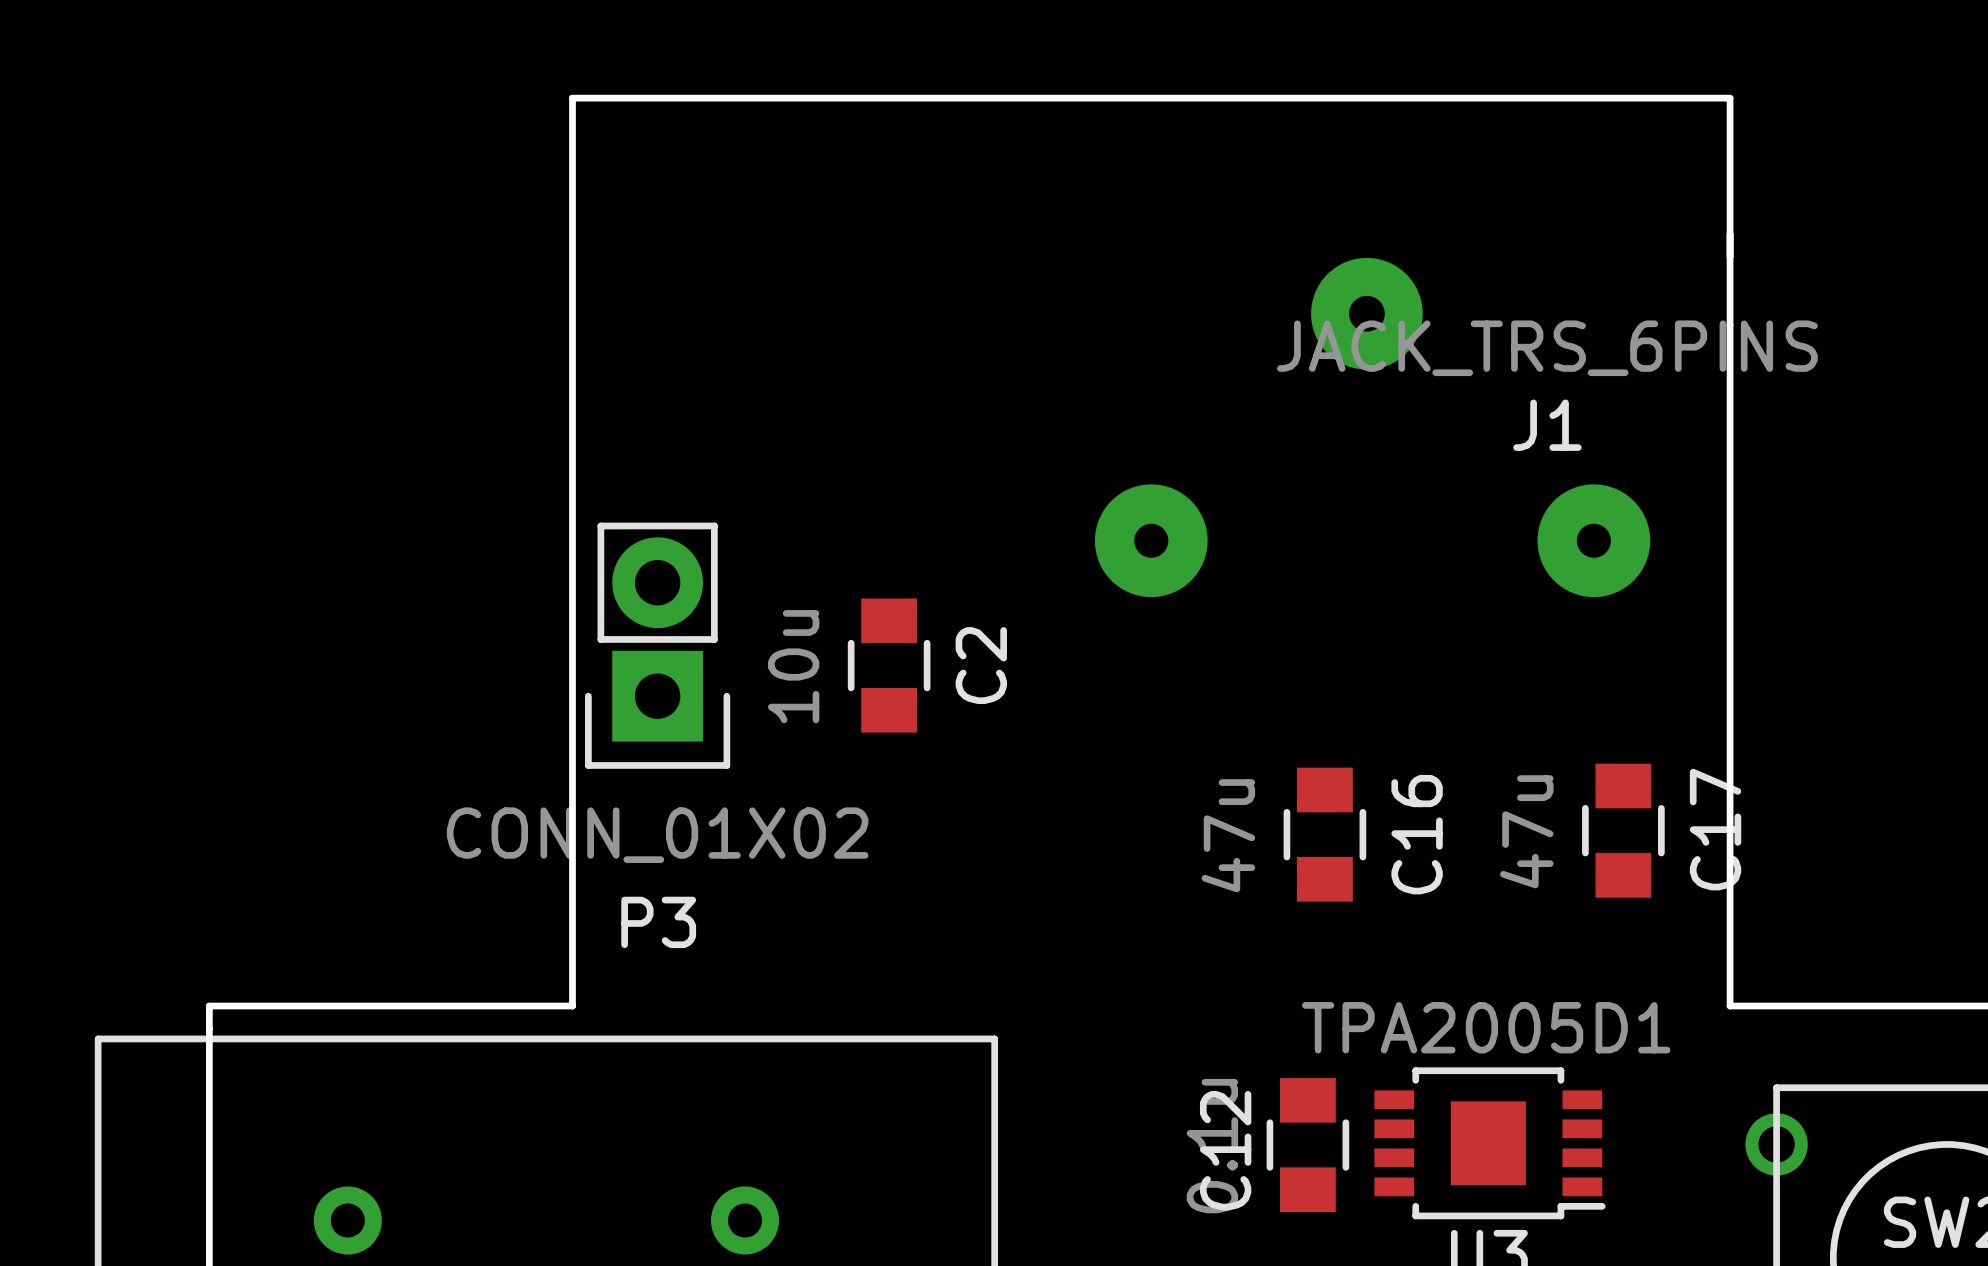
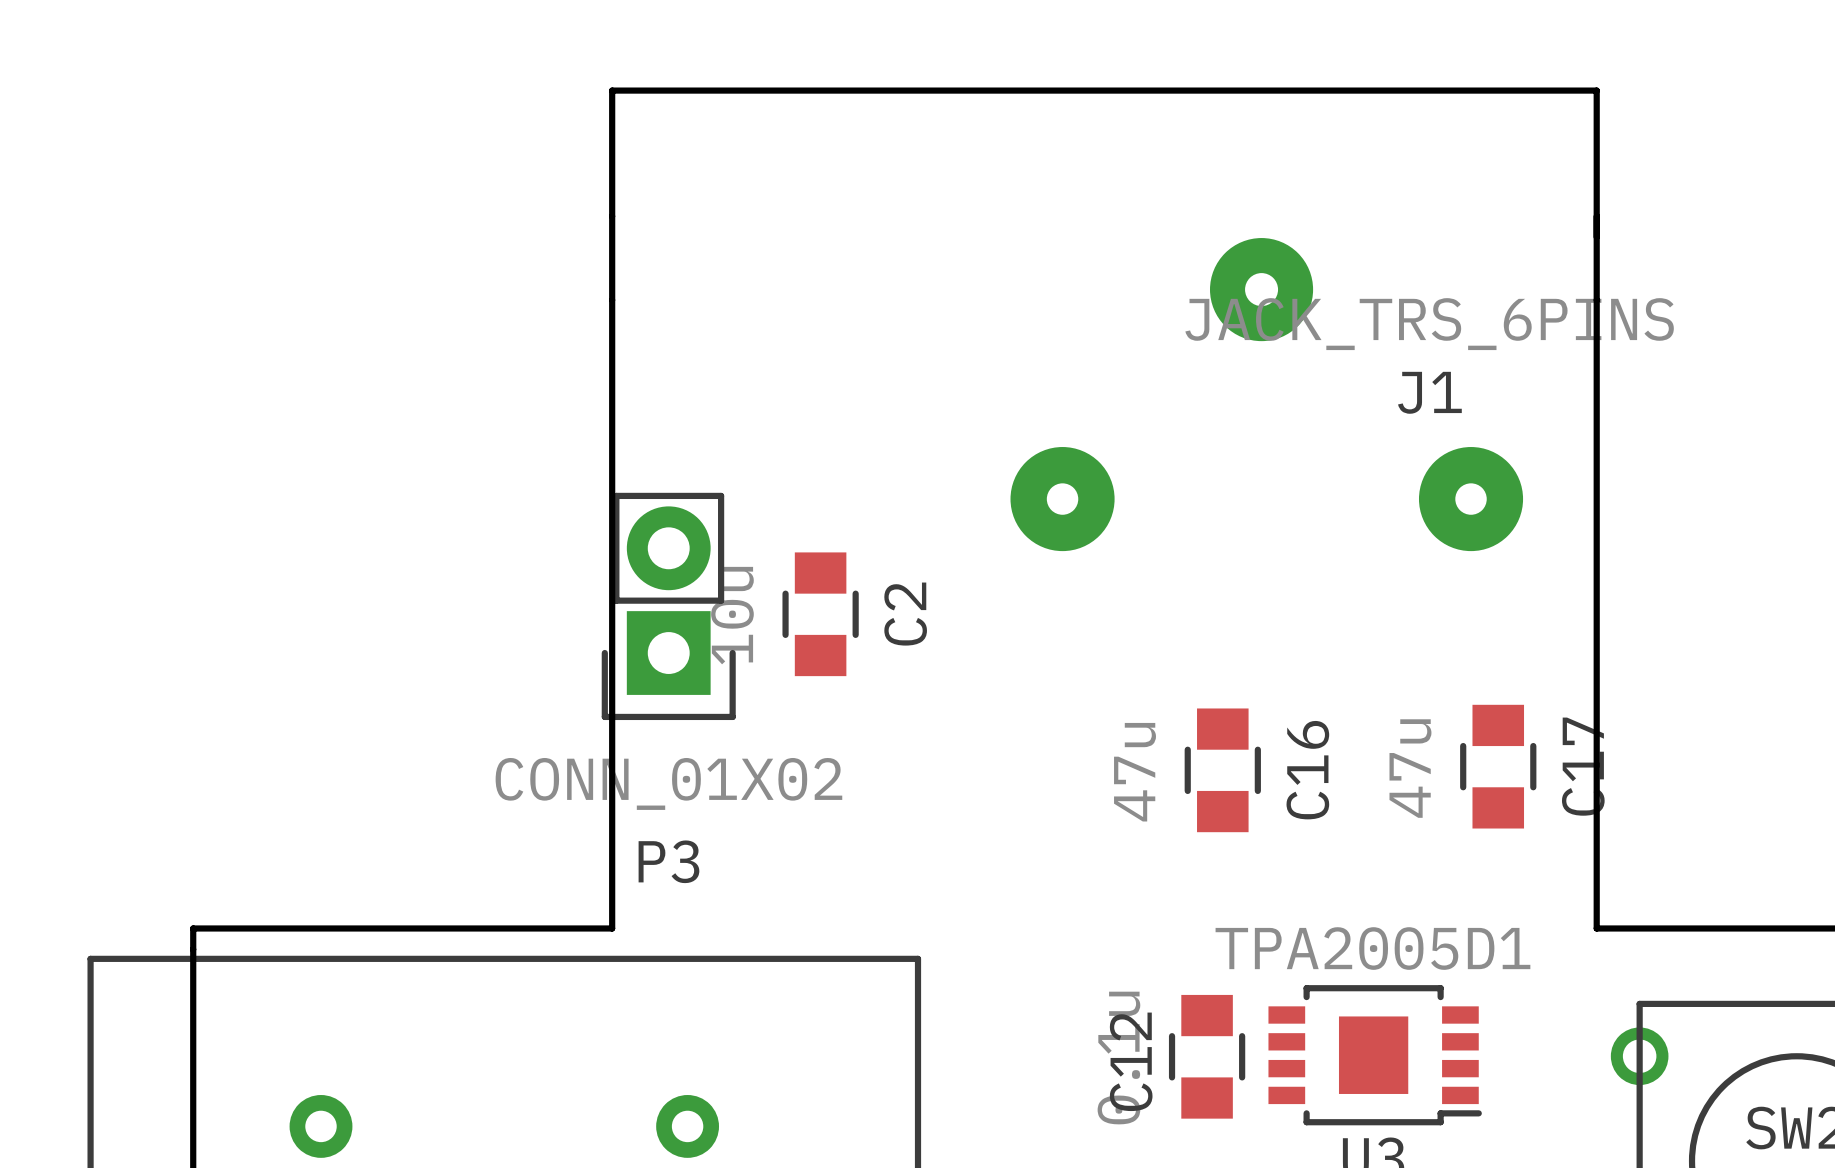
board edge: (663, 98) (572, 98) (572, 1006) -> (612, 90) (612, 928) (528, 928)
P3 position: (657, 645) -> (668, 606)

